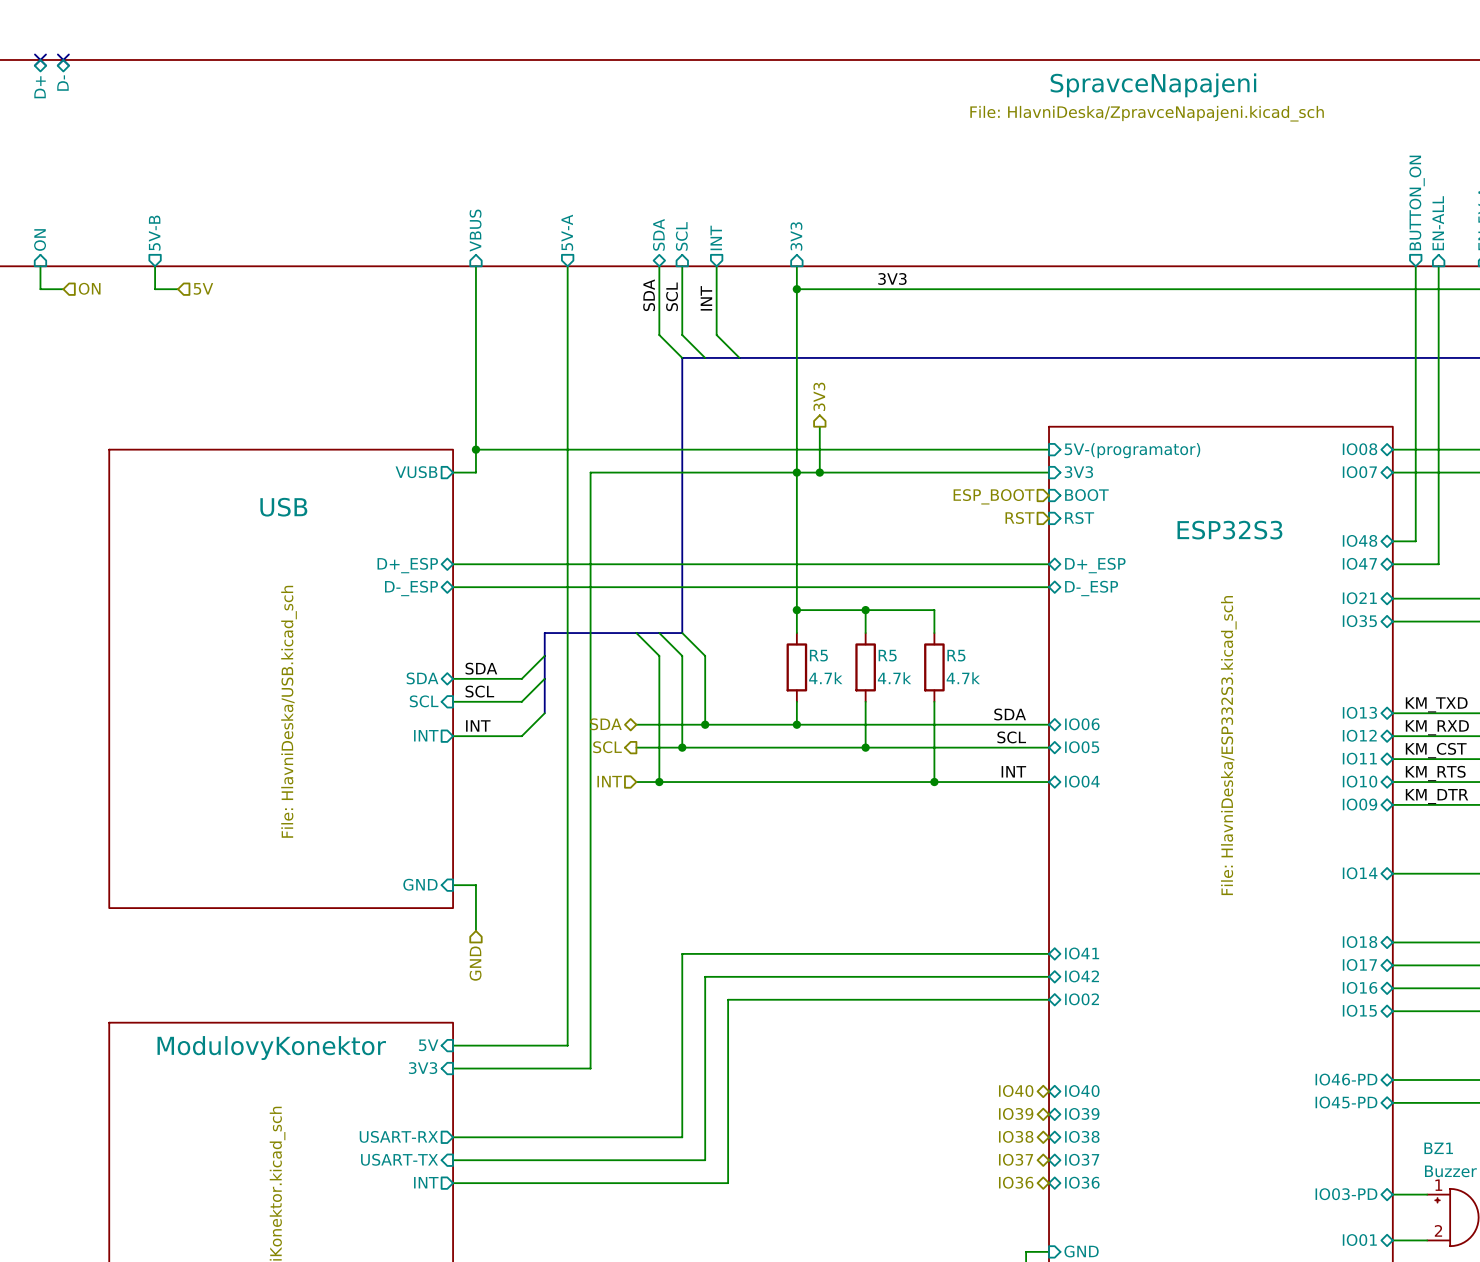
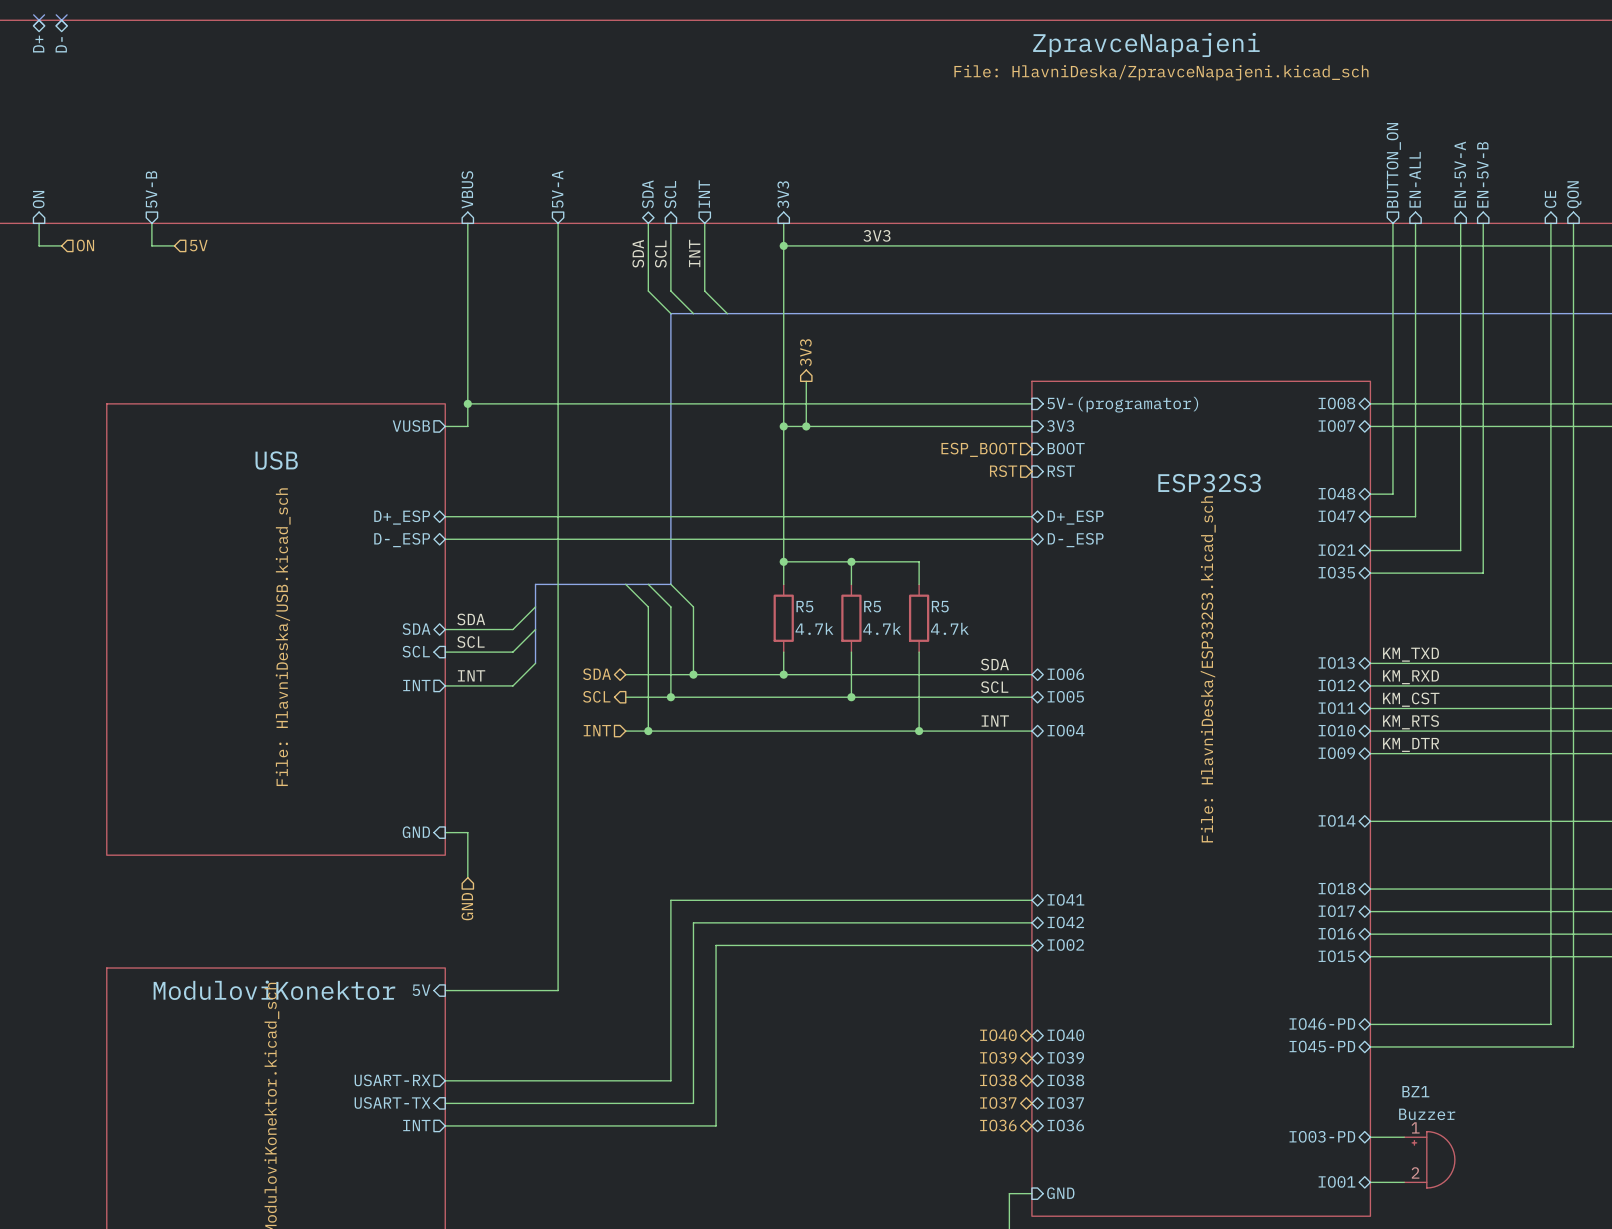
sheet SpravceNapajeni name: SpravceNapajeni (1153, 85) -> ZpravceNapajeni (1146, 44)
wire: (796, 472) (590, 472) (590, 1068) (453, 1068) -> none
sheet ModulovyKonektor name: ModulovyKonektor (271, 1048) -> ModuloviKonektor (274, 990)
sheet pin: 3V3 (423, 1068) -> none

